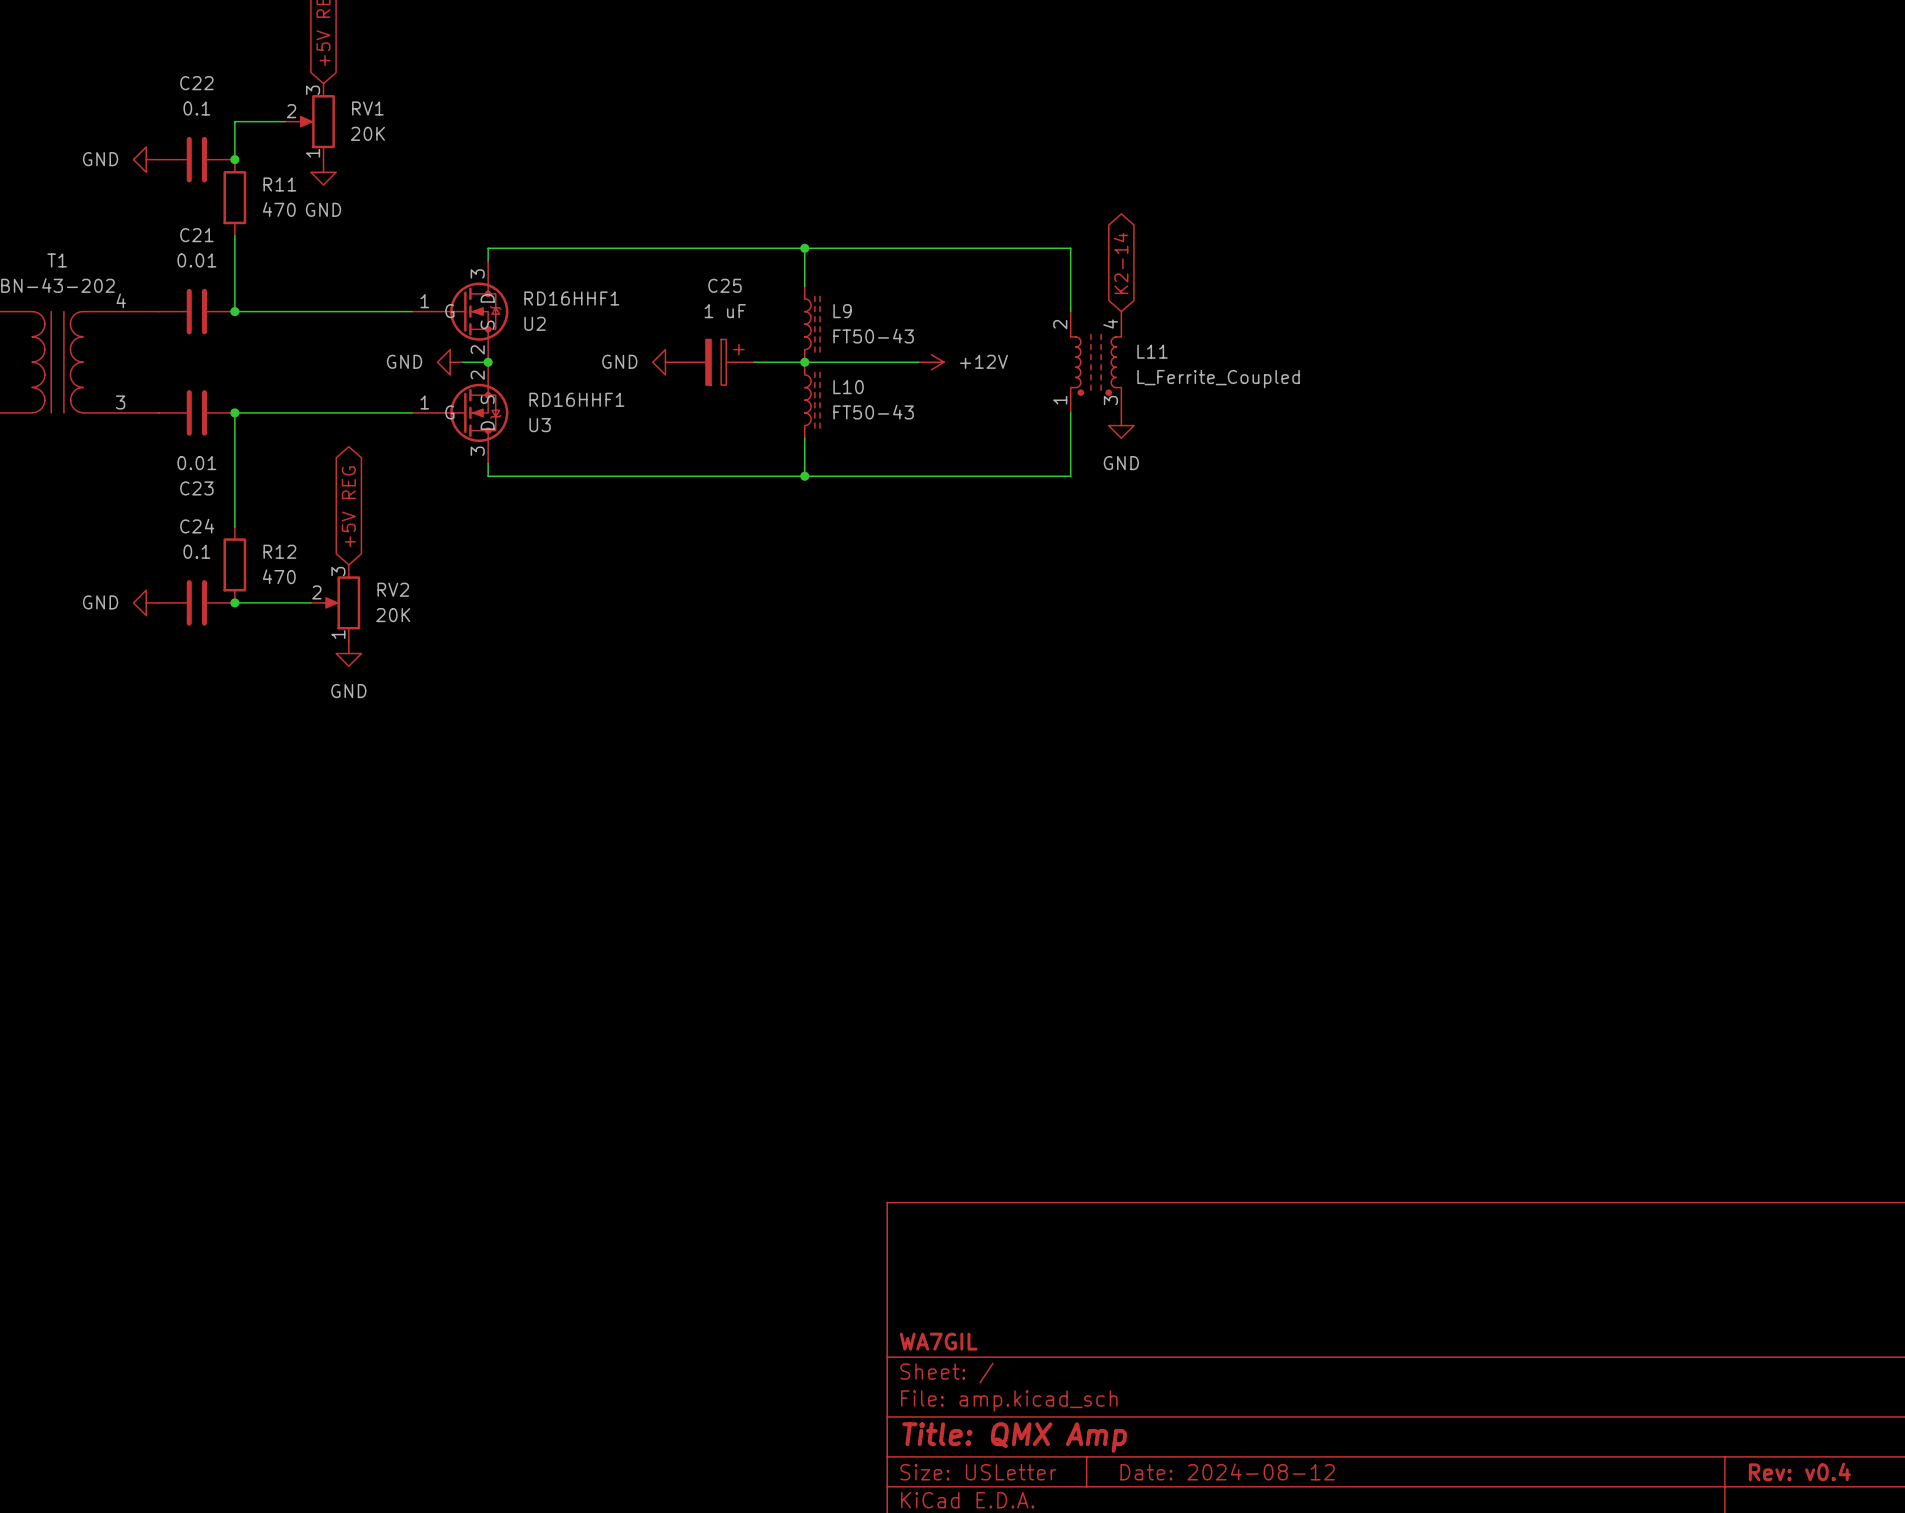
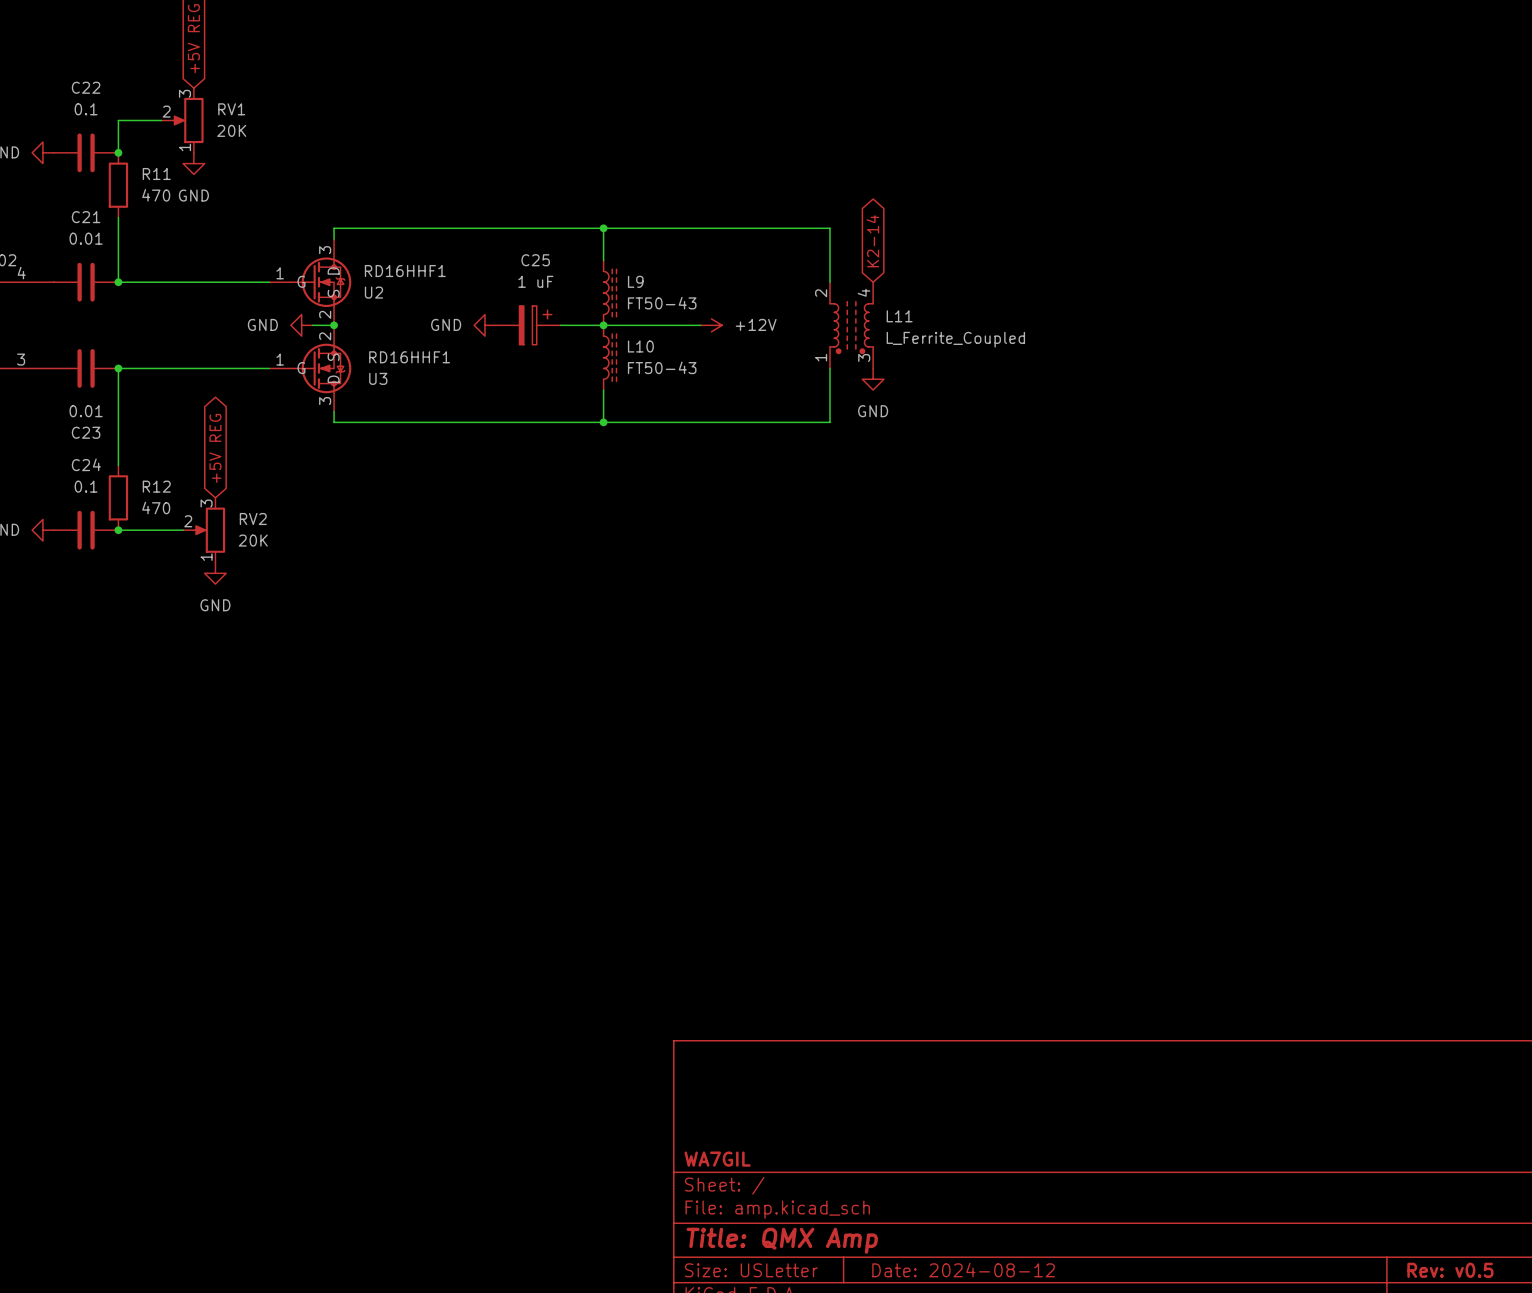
title block: Rev: v0.4 (1799, 1471) -> Rev: v0.5 (1450, 1270)

